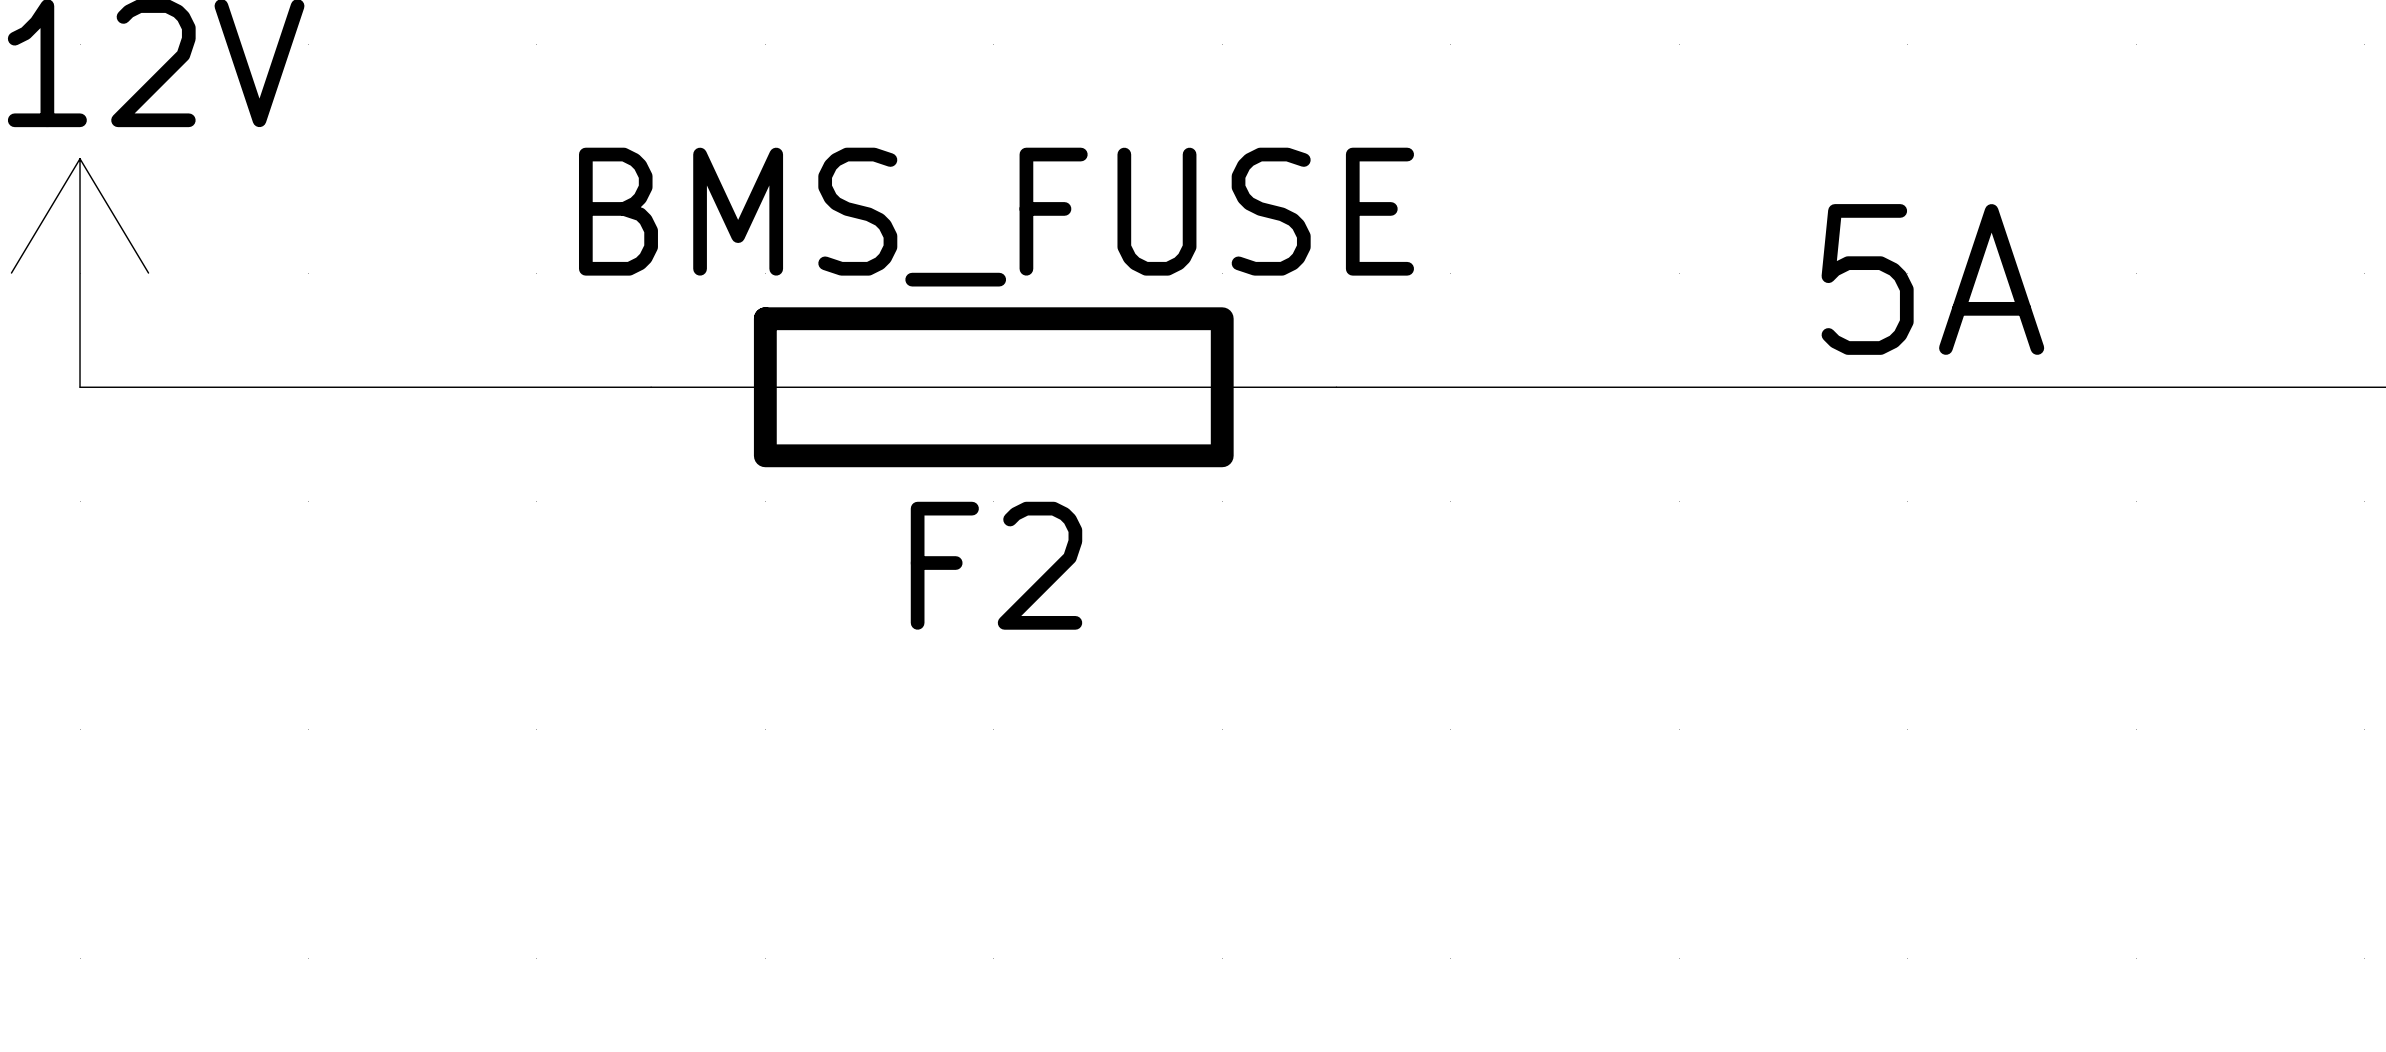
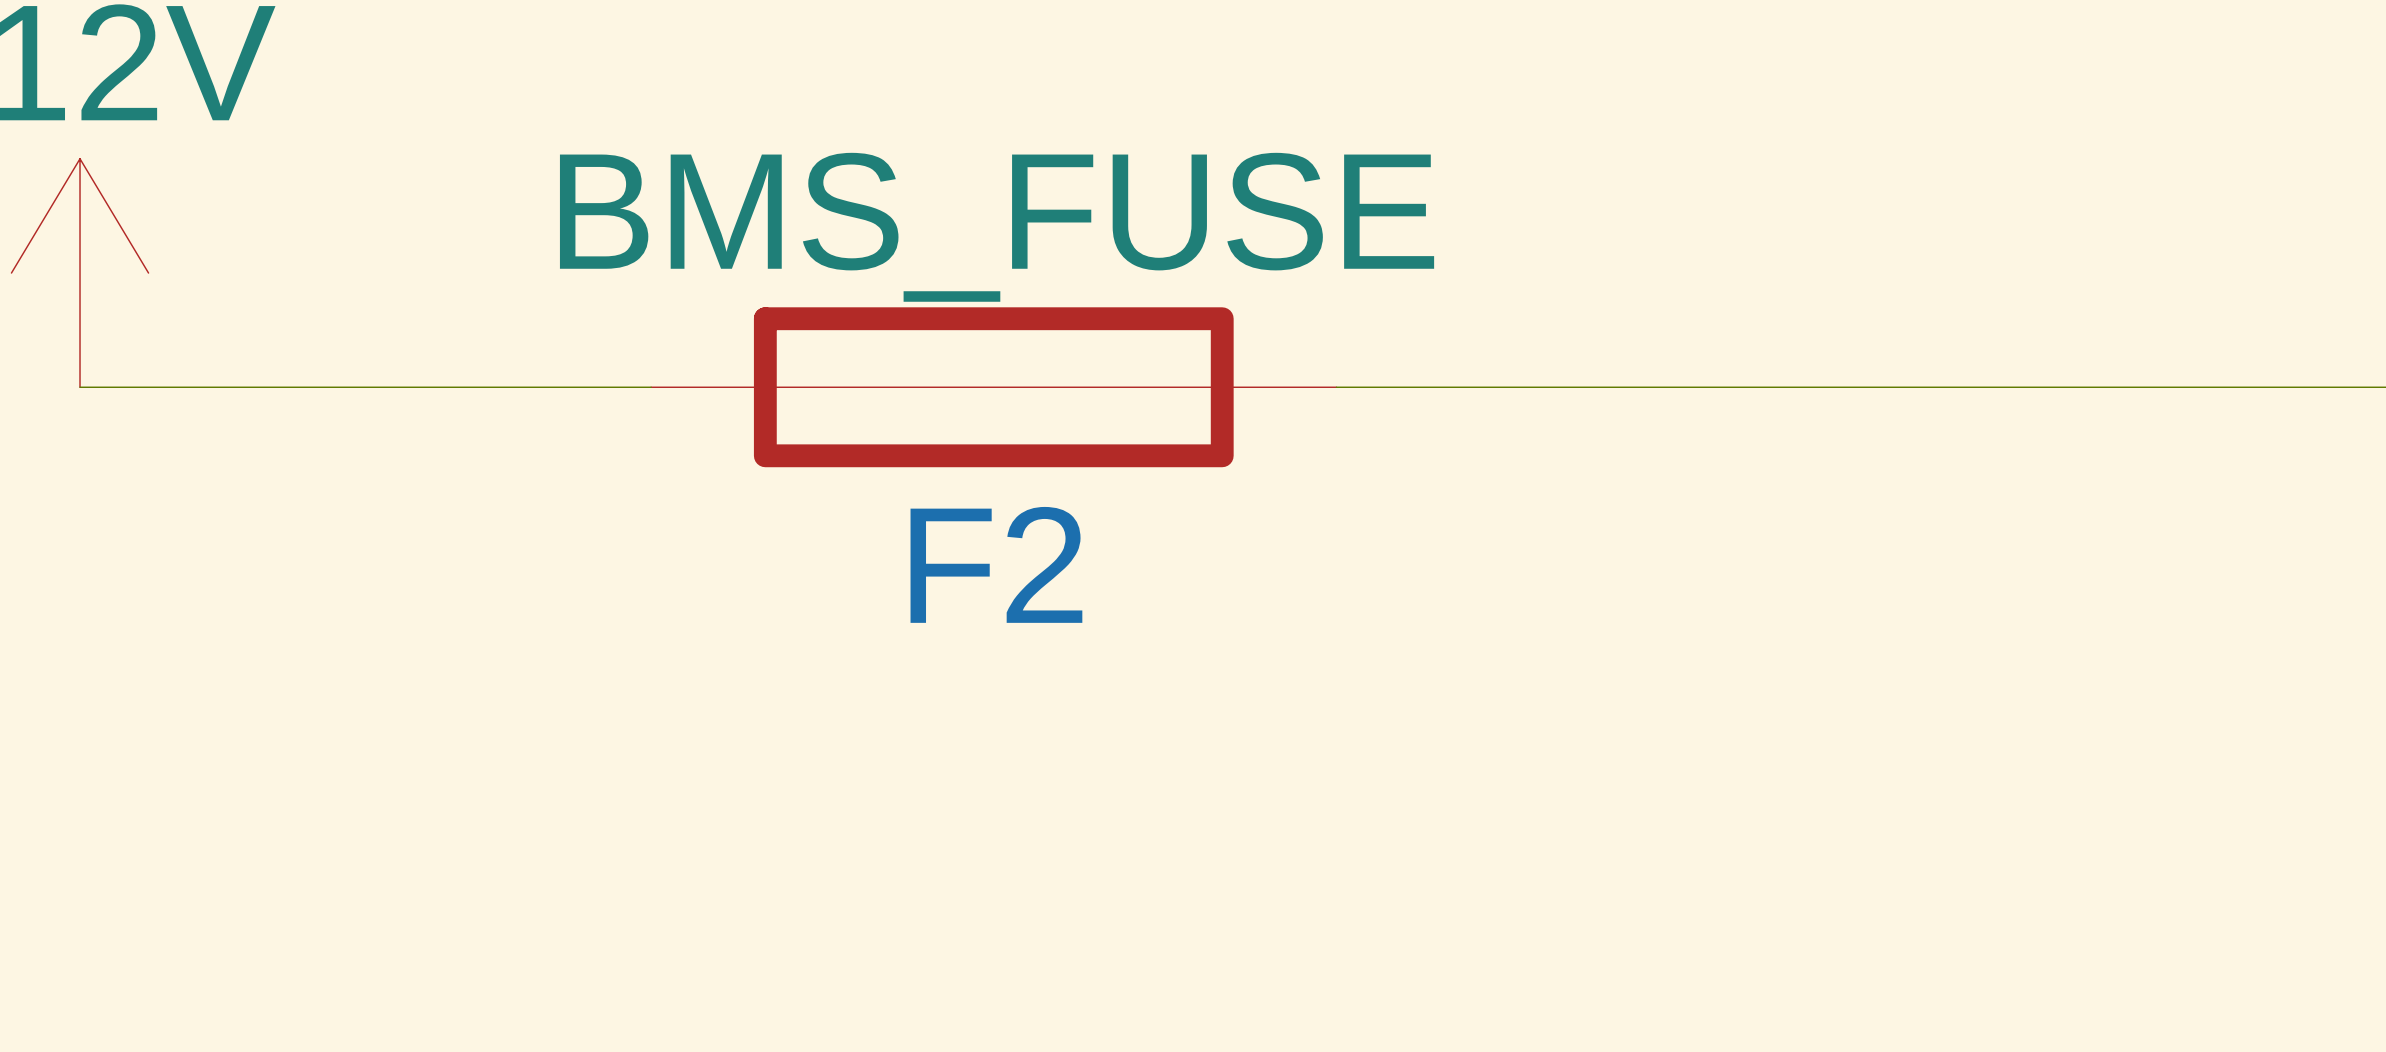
text: 5A (1932, 279) -> none

